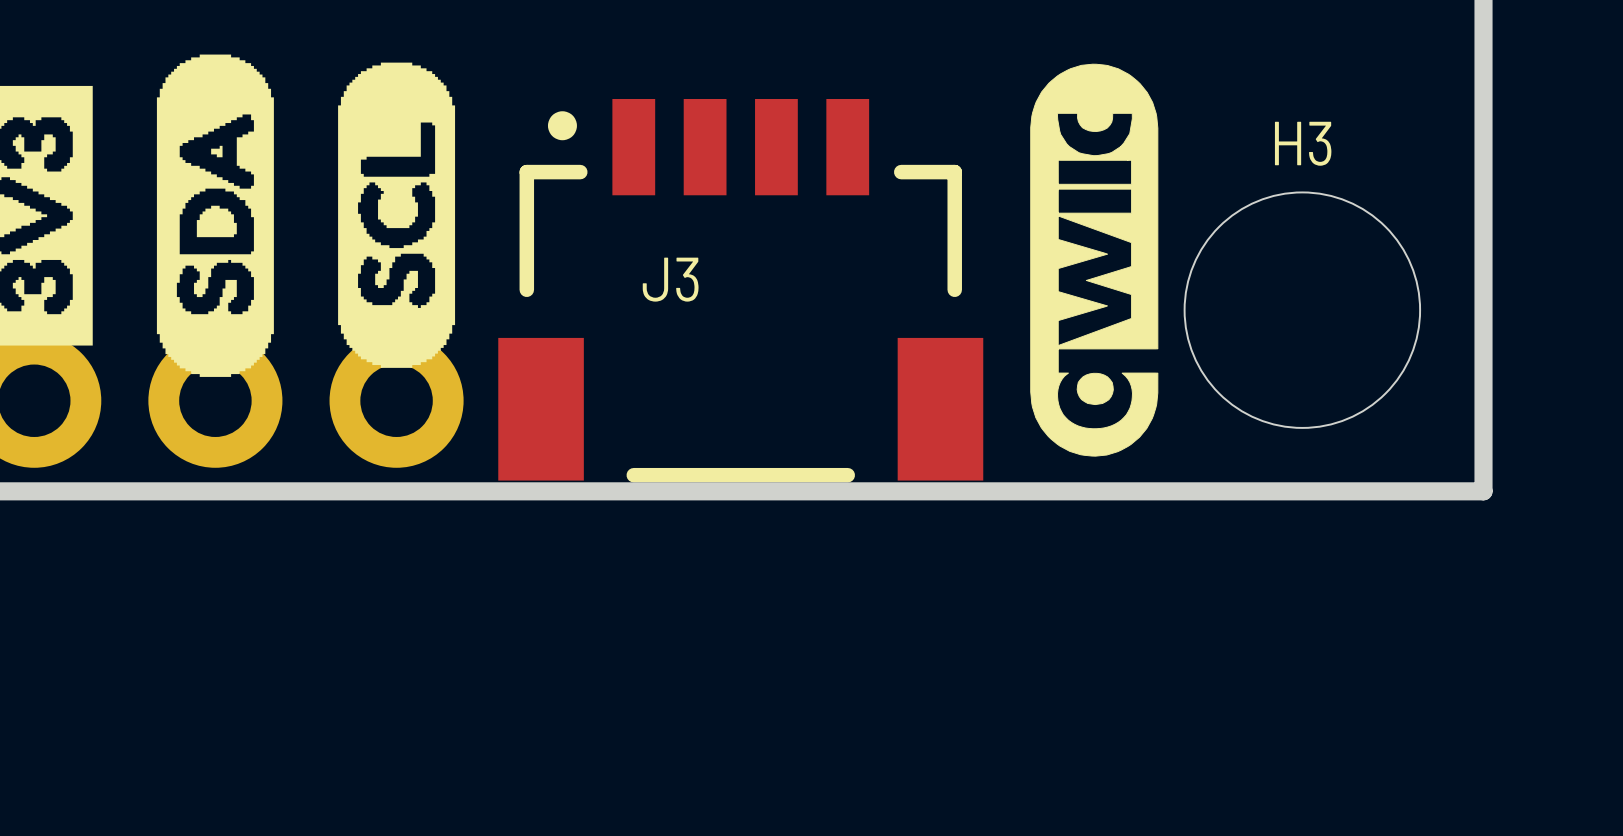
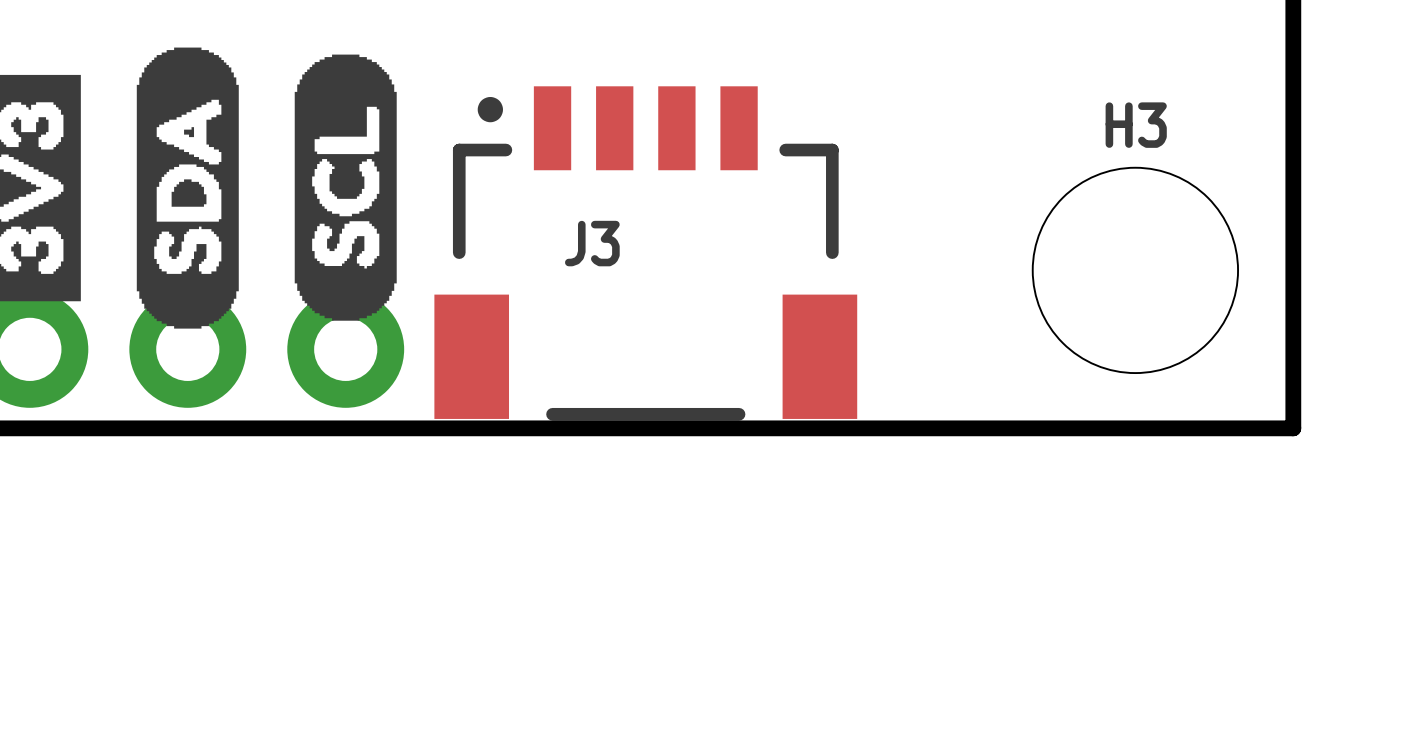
drawing: [1030, 63, 1159, 457] -> none

